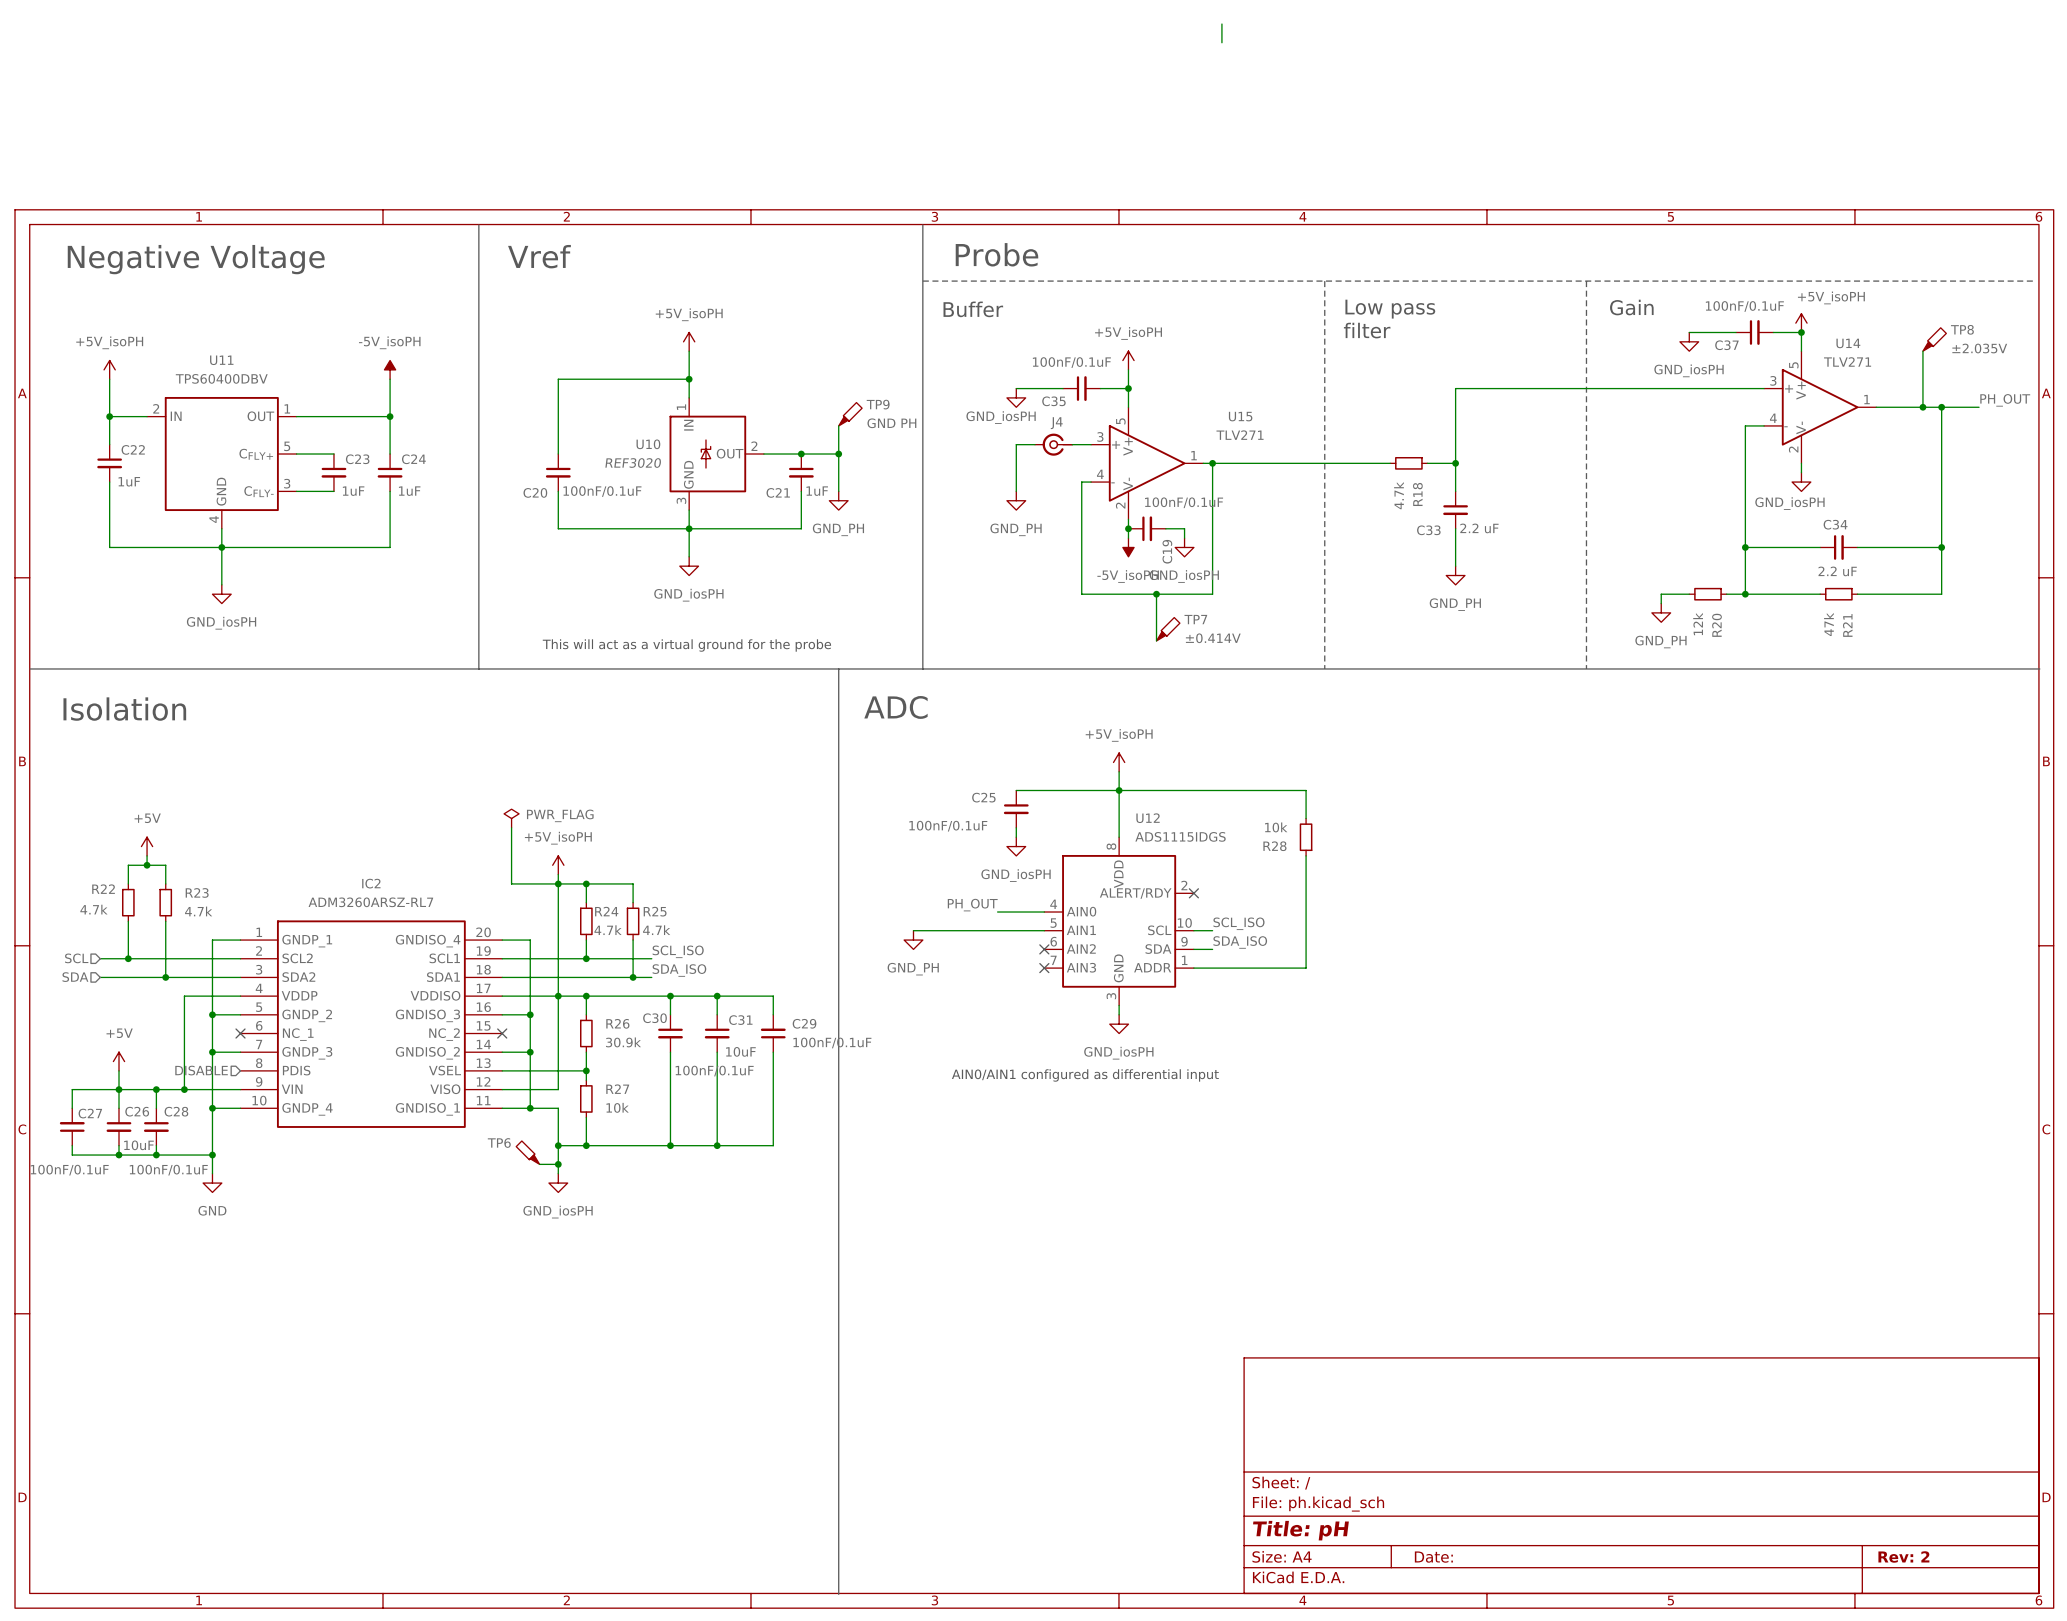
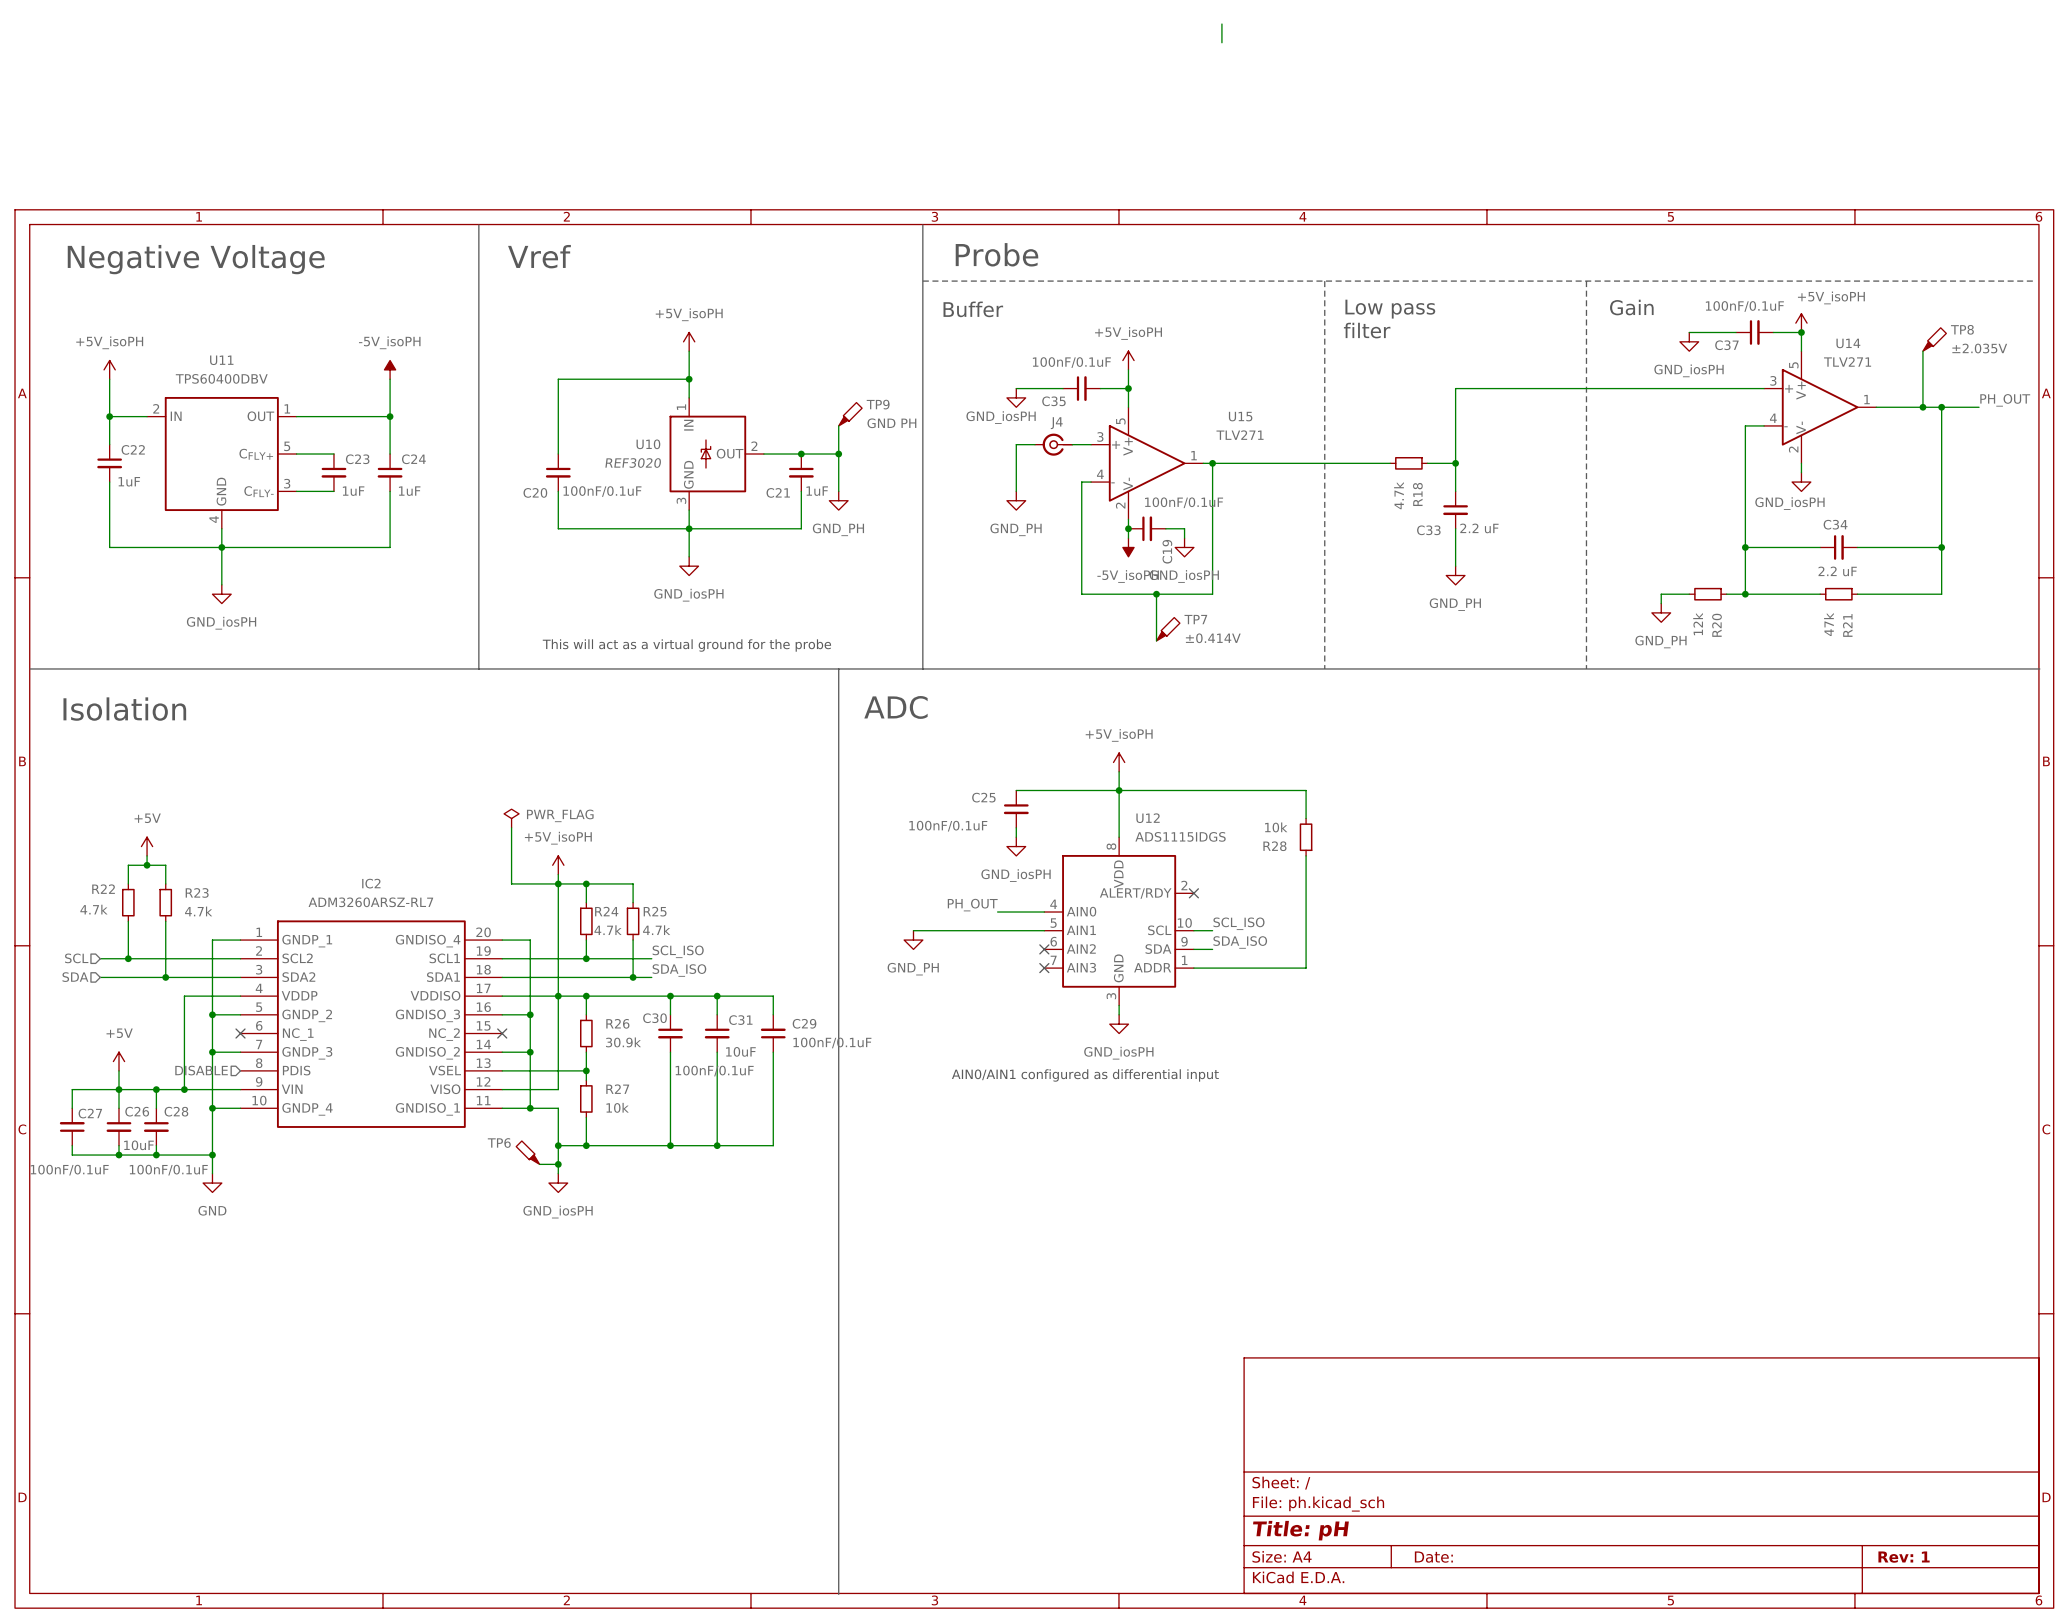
title block: Rev: 2 (1903, 1556) -> Rev: 1 (1904, 1557)

